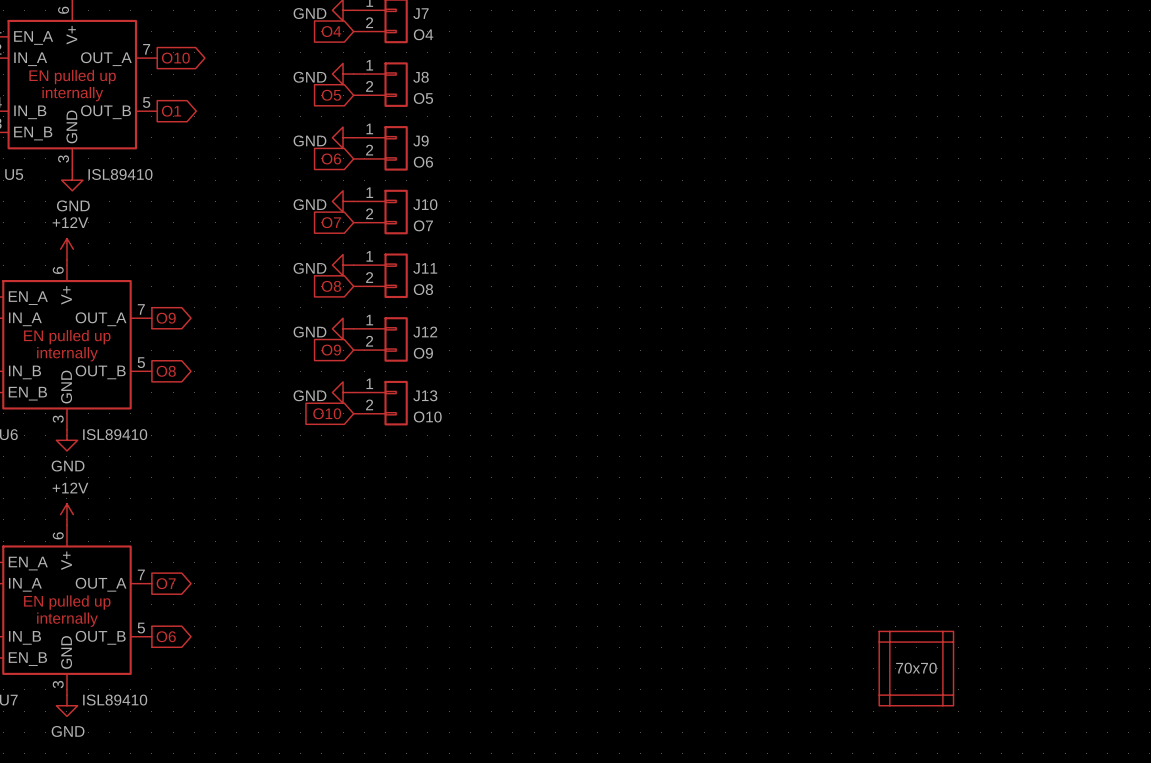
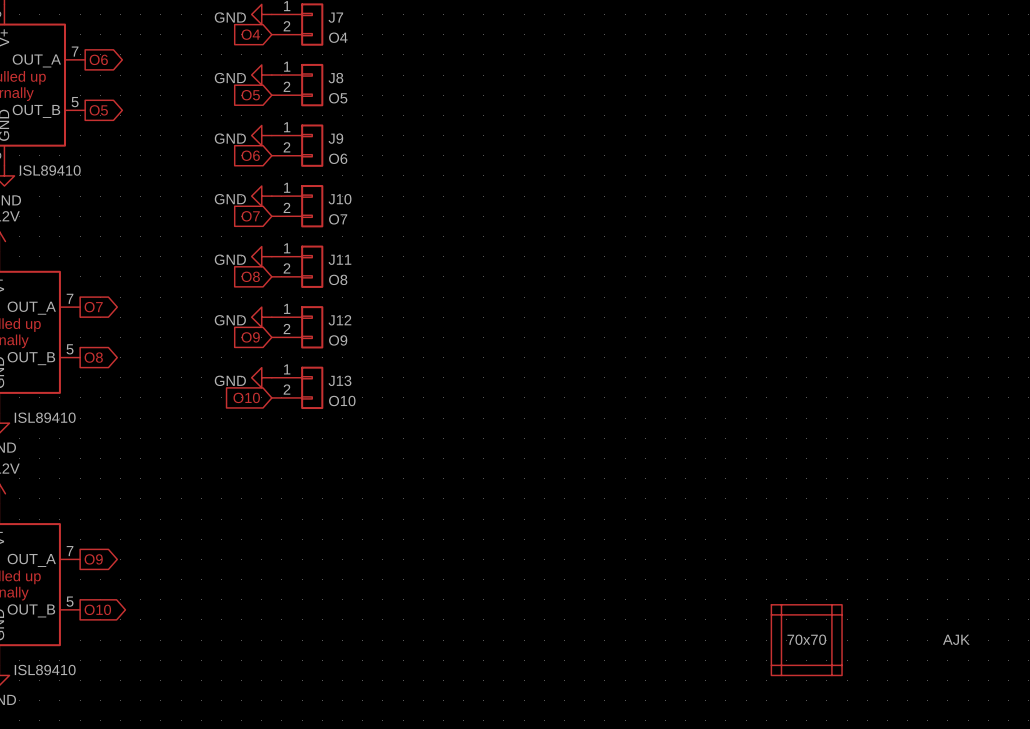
global label: O10 (175, 58) -> O6 (98, 59)
global label: O1 (171, 111) -> O5 (98, 110)
global label: O9 (166, 318) -> O7 (93, 307)
global label: O7 (166, 583) -> O9 (93, 559)
global label: O6 (166, 636) -> O10 (97, 609)
part: none -> AJK (956, 639)

